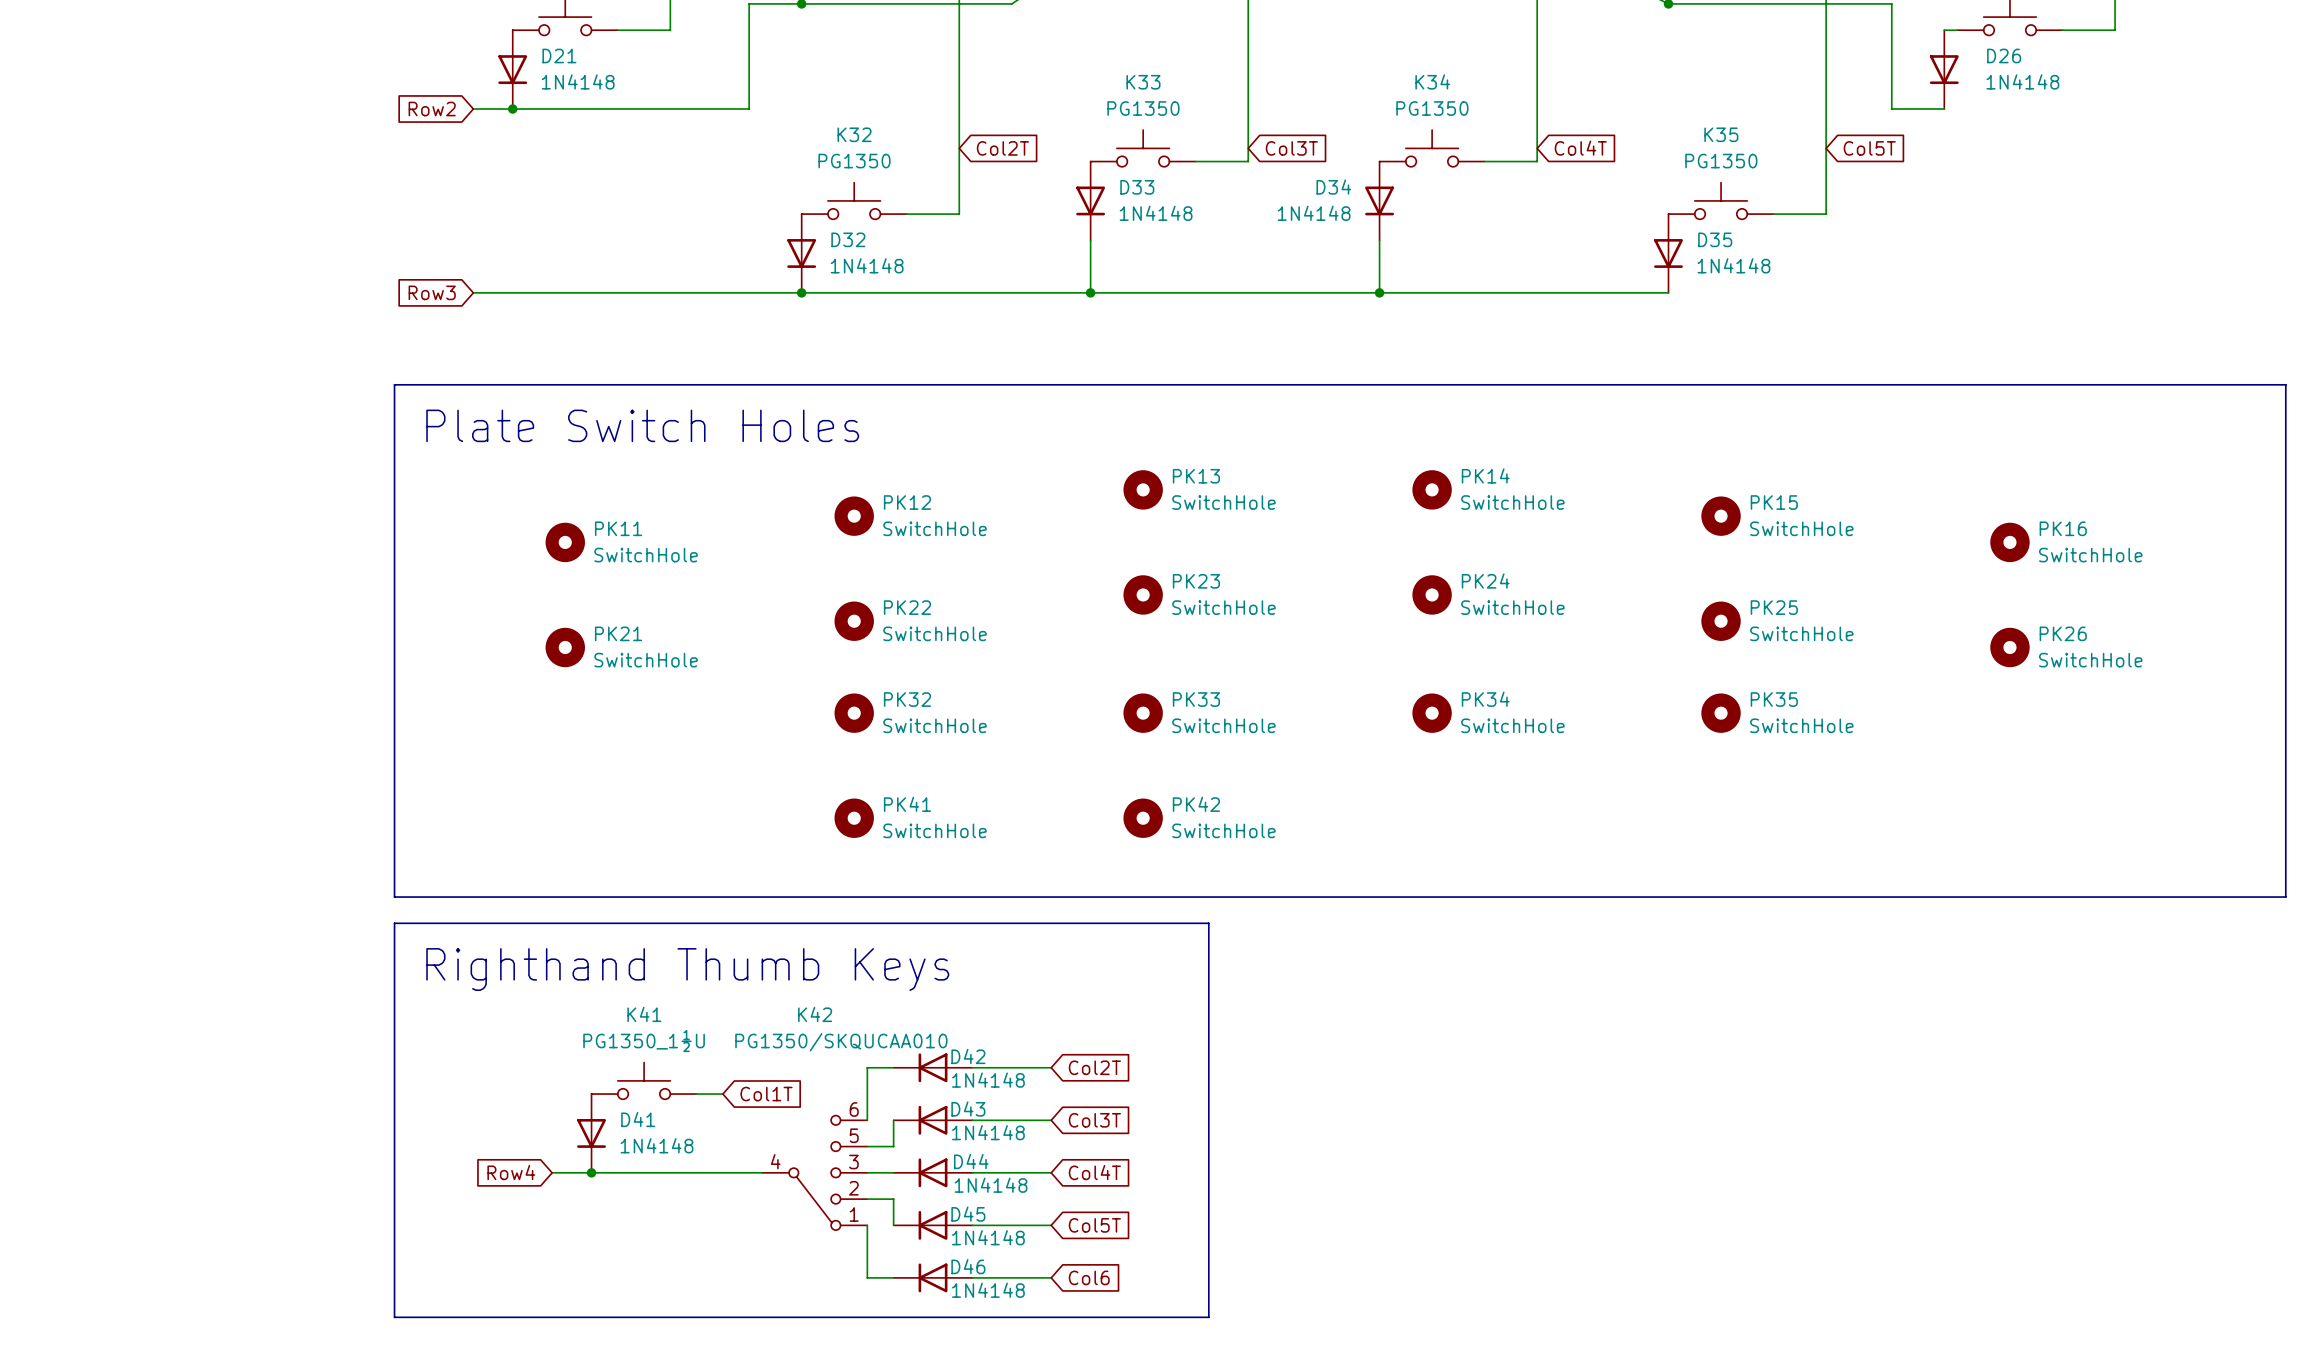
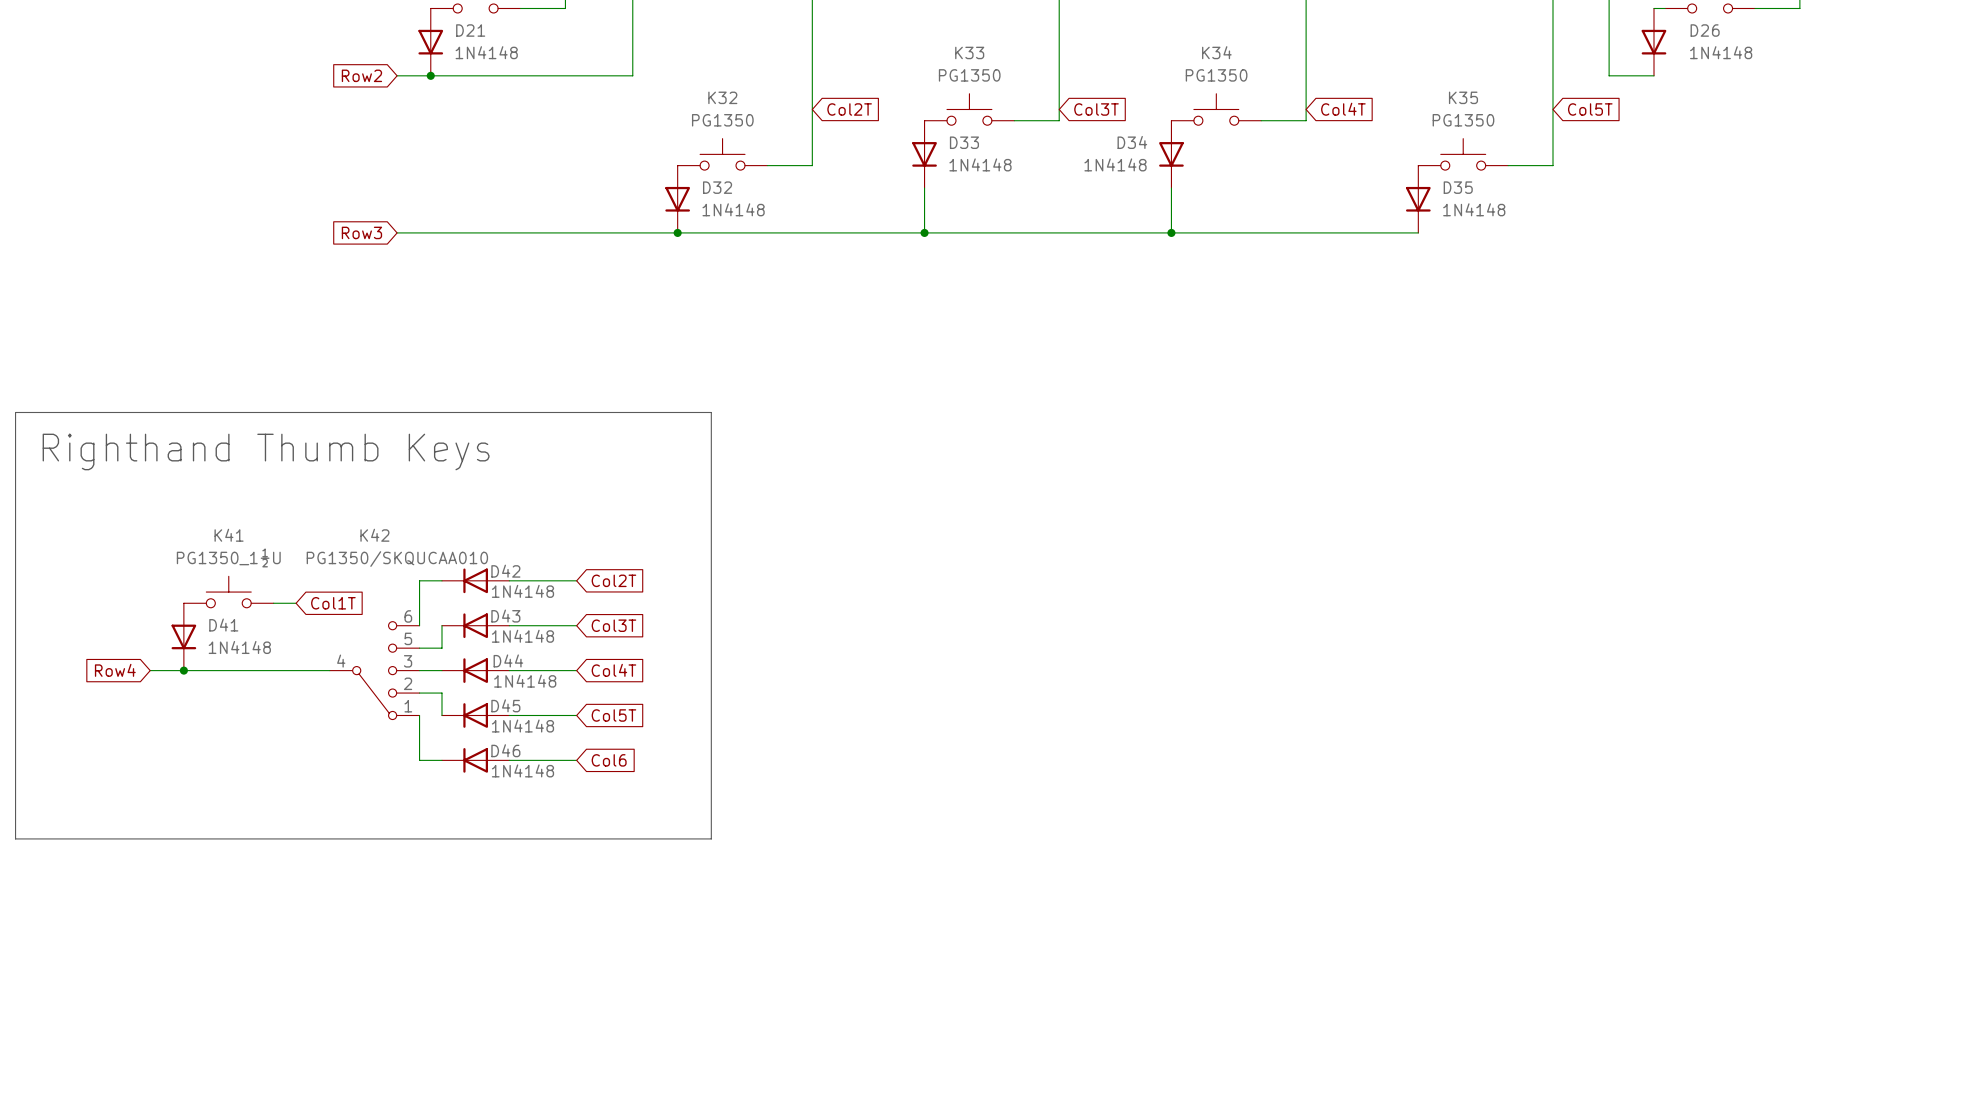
line: (394, 384) (2285, 384) (2285, 897) (394, 897) (394, 384) -> none
text: Plate Switch Holes (642, 425) -> none
PK13: SwitchHole (1143, 489) -> none
PK14: SwitchHole (1432, 489) -> none
line: none -> (15, 412) (711, 412) (711, 838) (15, 838) (15, 412)
PK12: SwitchHole (854, 516) -> none
PK15: SwitchHole (1721, 516) -> none
PK11: SwitchHole (565, 542) -> none
PK16: SwitchHole (2009, 542) -> none
text: none -> Righthand Thumb Keys (266, 451)
PK23: SwitchHole (1143, 594) -> none
PK24: SwitchHole (1432, 594) -> none
PK22: SwitchHole (854, 621) -> none
PK25: SwitchHole (1721, 621) -> none
PK21: SwitchHole (565, 647) -> none
PK26: SwitchHole (2009, 647) -> none
wire: none -> (441, 580) (419, 580) (419, 625)
wire: none -> (509, 580) (576, 580)
global label: none -> Col2T (613, 580)
PK32: SwitchHole (854, 713) -> none
PK33: SwitchHole (1143, 713) -> none
PK34: SwitchHole (1432, 713) -> none
PK35: SwitchHole (1721, 713) -> none
wire: none -> (273, 603) (296, 603)
global label: none -> Col1T (333, 603)
wire: none -> (441, 625) (441, 648) (419, 648)
wire: none -> (509, 625) (576, 625)
global label: none -> Col3T (613, 625)
global label: none -> Row4 (115, 670)
global label: none -> Col4T (613, 670)
wire: none -> (150, 670) (329, 670)
junction: none -> (183, 670)
wire: none -> (419, 670) (441, 670)
wire: none -> (509, 670) (576, 670)
PK41: SwitchHole (854, 818) -> none
PK42: SwitchHole (1143, 818) -> none
wire: none -> (419, 693) (441, 693) (441, 715)
wire: none -> (419, 715) (419, 760) (441, 760)
wire: none -> (509, 715) (576, 715)
global label: none -> Col5T (613, 715)
wire: none -> (509, 760) (576, 760)
global label: none -> Col6 (609, 760)
line: (394, 923) (394, 1317) (1208, 1317) (1208, 923) (394, 923) -> none
text: Righthand Thumb Keys (687, 969) -> none
wire: (893, 1067) (867, 1067) (867, 1120) -> none
D42 position: (933, 1067) -> (475, 580)
wire: (972, 1067) (1051, 1067) -> none
global label: Col2T (1094, 1067) -> none
K41 position: (644, 1080) -> (228, 592)
wire: (696, 1094) (722, 1094) -> none
global label: Col1T (766, 1094) -> none
wire: (893, 1120) (893, 1146) (867, 1146) -> none
D43 position: (933, 1120) -> (475, 625)
wire: (972, 1120) (1051, 1120) -> none
global label: Col3T (1094, 1120) -> none
D41 position: (591, 1133) -> (183, 636)
global label: Row4 (511, 1172) -> none
wire: (552, 1172) (762, 1172) -> none
junction: (591, 1172) -> none
K42 position: (814, 1172) -> (374, 670)
wire: (867, 1172) (893, 1172) -> none
D44 position: (933, 1172) -> (475, 670)
wire: (972, 1172) (1051, 1172) -> none
global label: Col4T (1094, 1172) -> none
wire: (867, 1199) (893, 1199) (893, 1225) -> none
wire: (867, 1225) (867, 1277) (893, 1277) -> none
D45 position: (933, 1225) -> (475, 715)
wire: (972, 1225) (1051, 1225) -> none
global label: Col5T (1094, 1225) -> none
D46 position: (933, 1277) -> (475, 760)
wire: (972, 1277) (1051, 1277) -> none
global label: Col6 (1089, 1277) -> none

